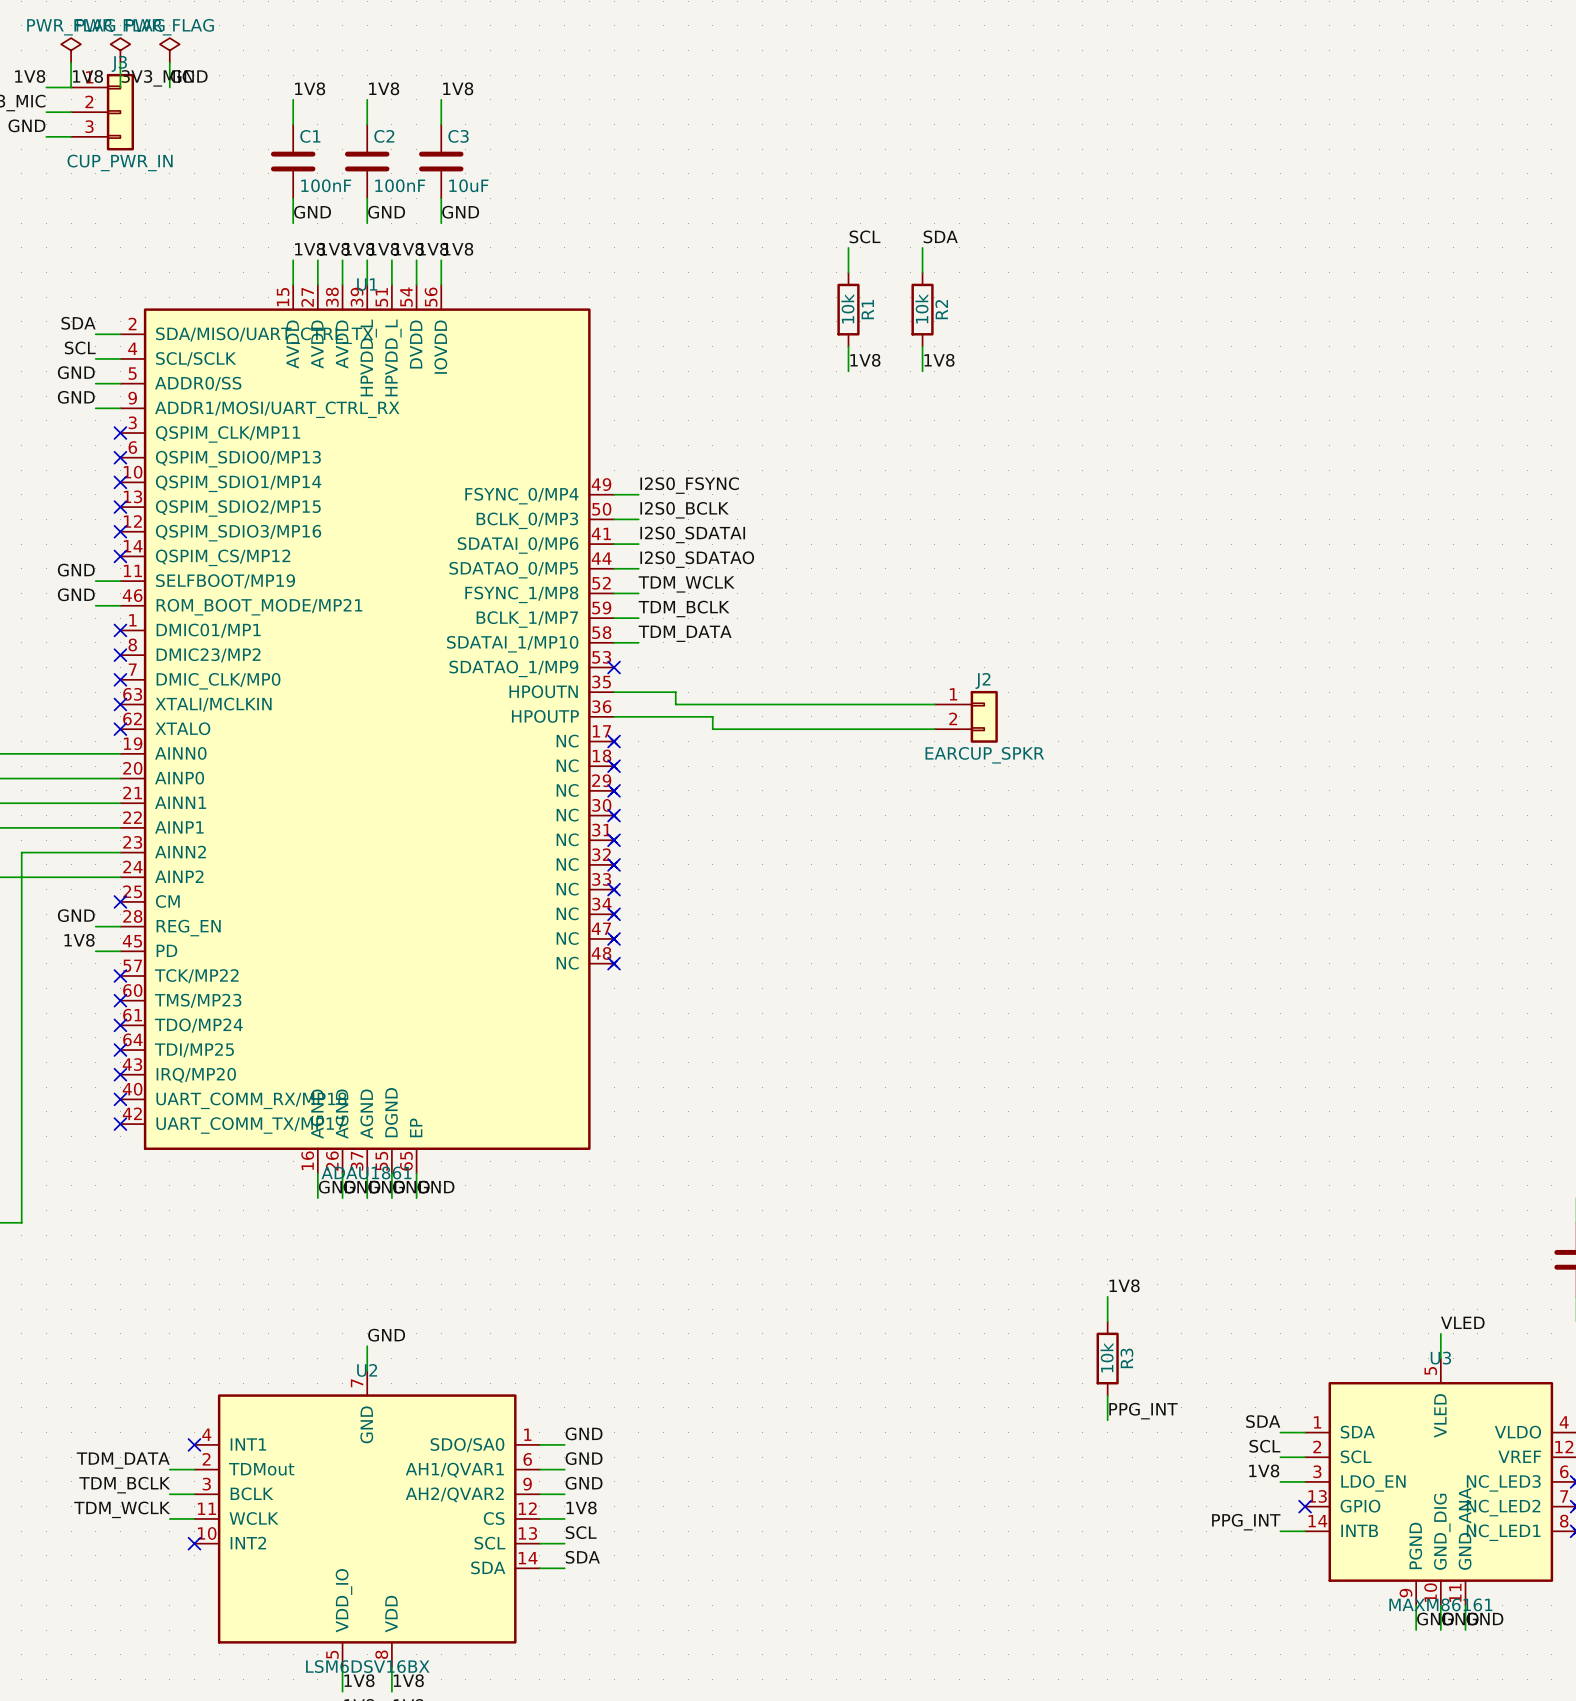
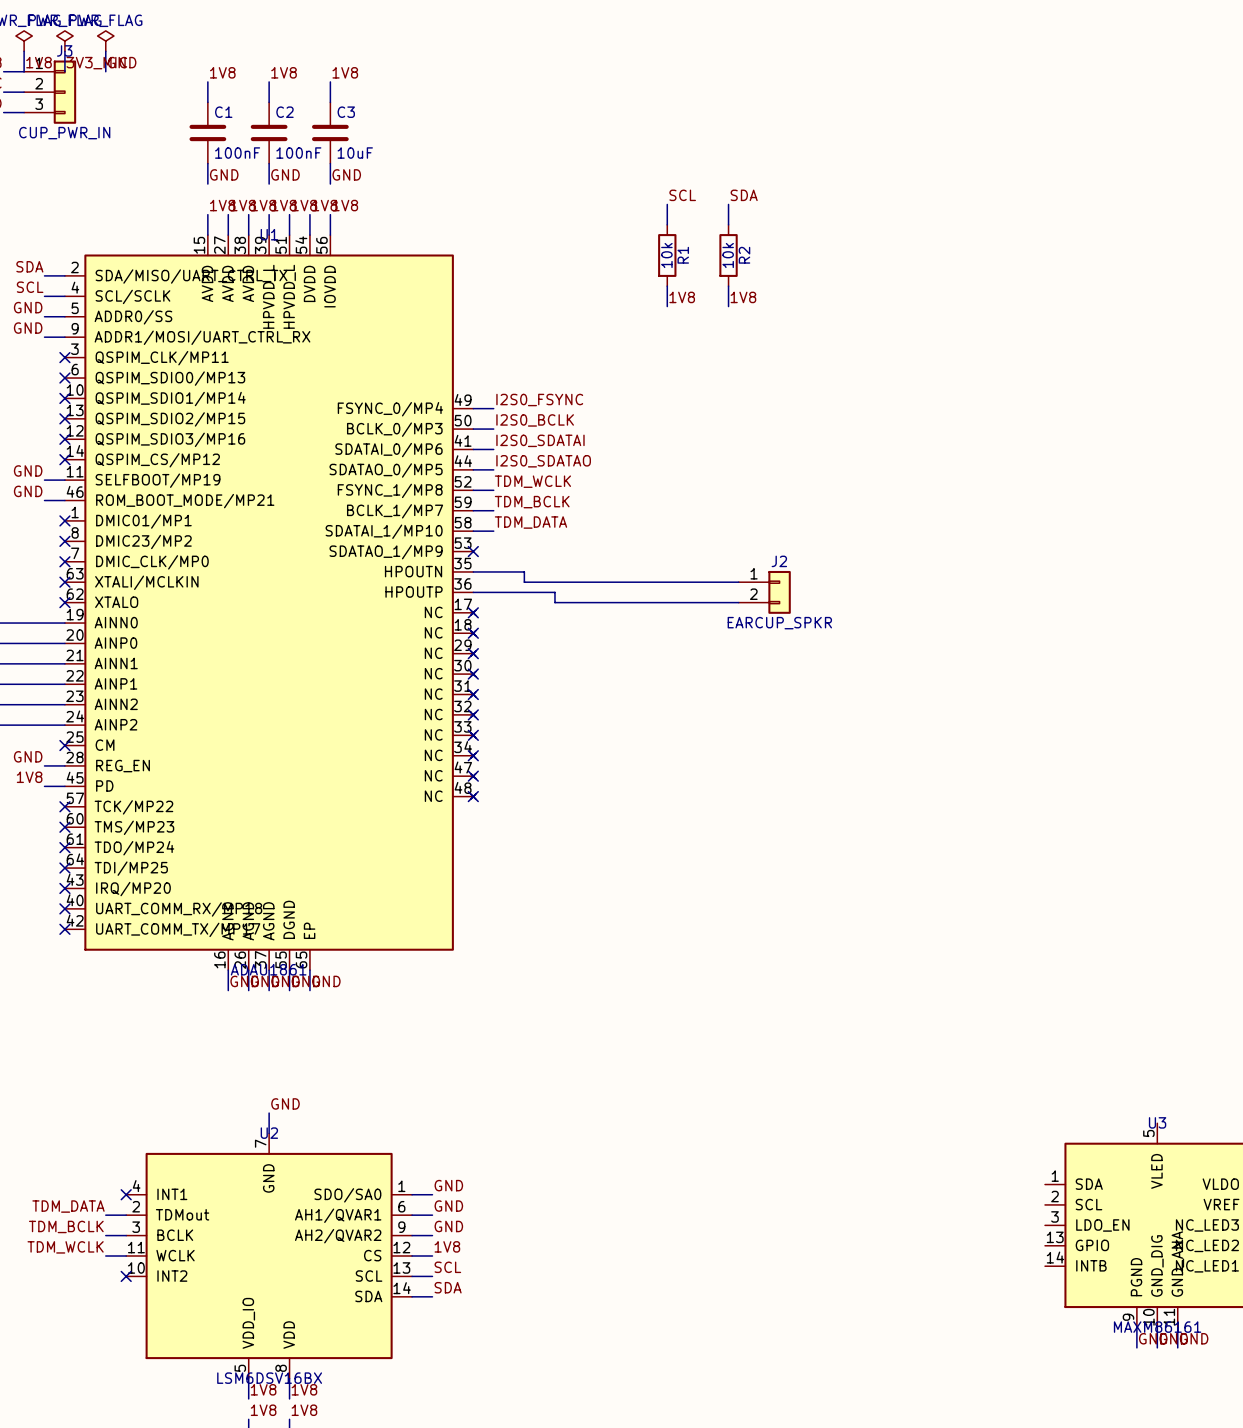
label: 1V8 (1124, 1285) -> none
wire: (1107, 1296) (1107, 1321) -> none
label: VLED (1462, 1322) -> none
wire: (1440, 1333) (1440, 1358) -> none
R3: 10k (1107, 1358) -> none
wire: (1107, 1395) (1107, 1420) -> none
label: PPG_INT (1143, 1411) -> none
label: SDA (1263, 1421) -> none
wire: (1280, 1432) (1305, 1432) -> none
label: SCL (1264, 1446) -> none
wire: (1280, 1457) (1305, 1457) -> none
label: 1V8 (1264, 1470) -> none
wire: (1280, 1481) (1305, 1481) -> none
no-connect mark: (1305, 1506) -> none
label: PPG_INT (1246, 1522) -> none
wire: (1280, 1531) (1305, 1531) -> none

